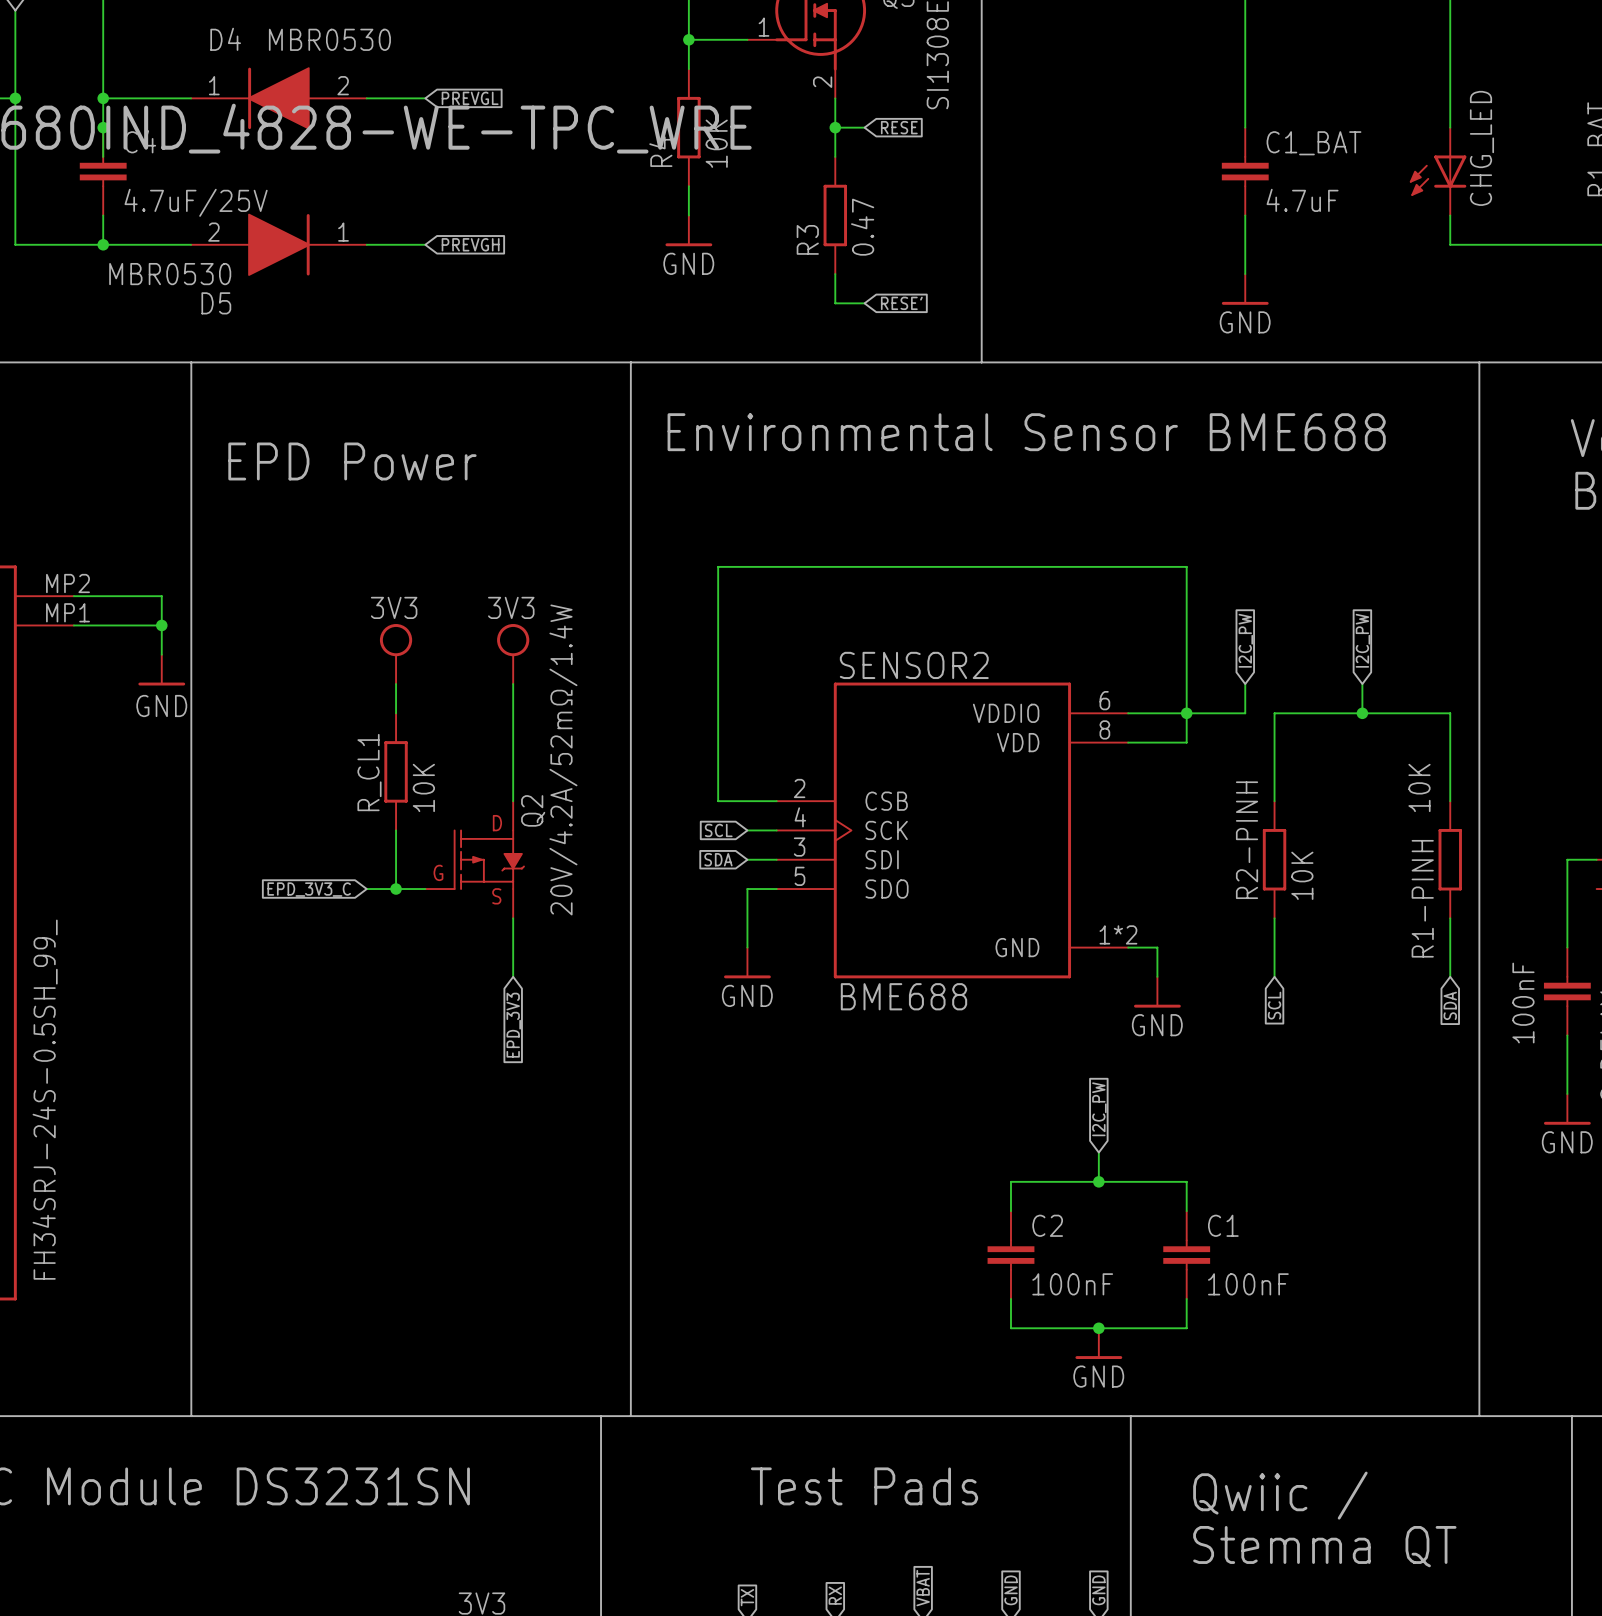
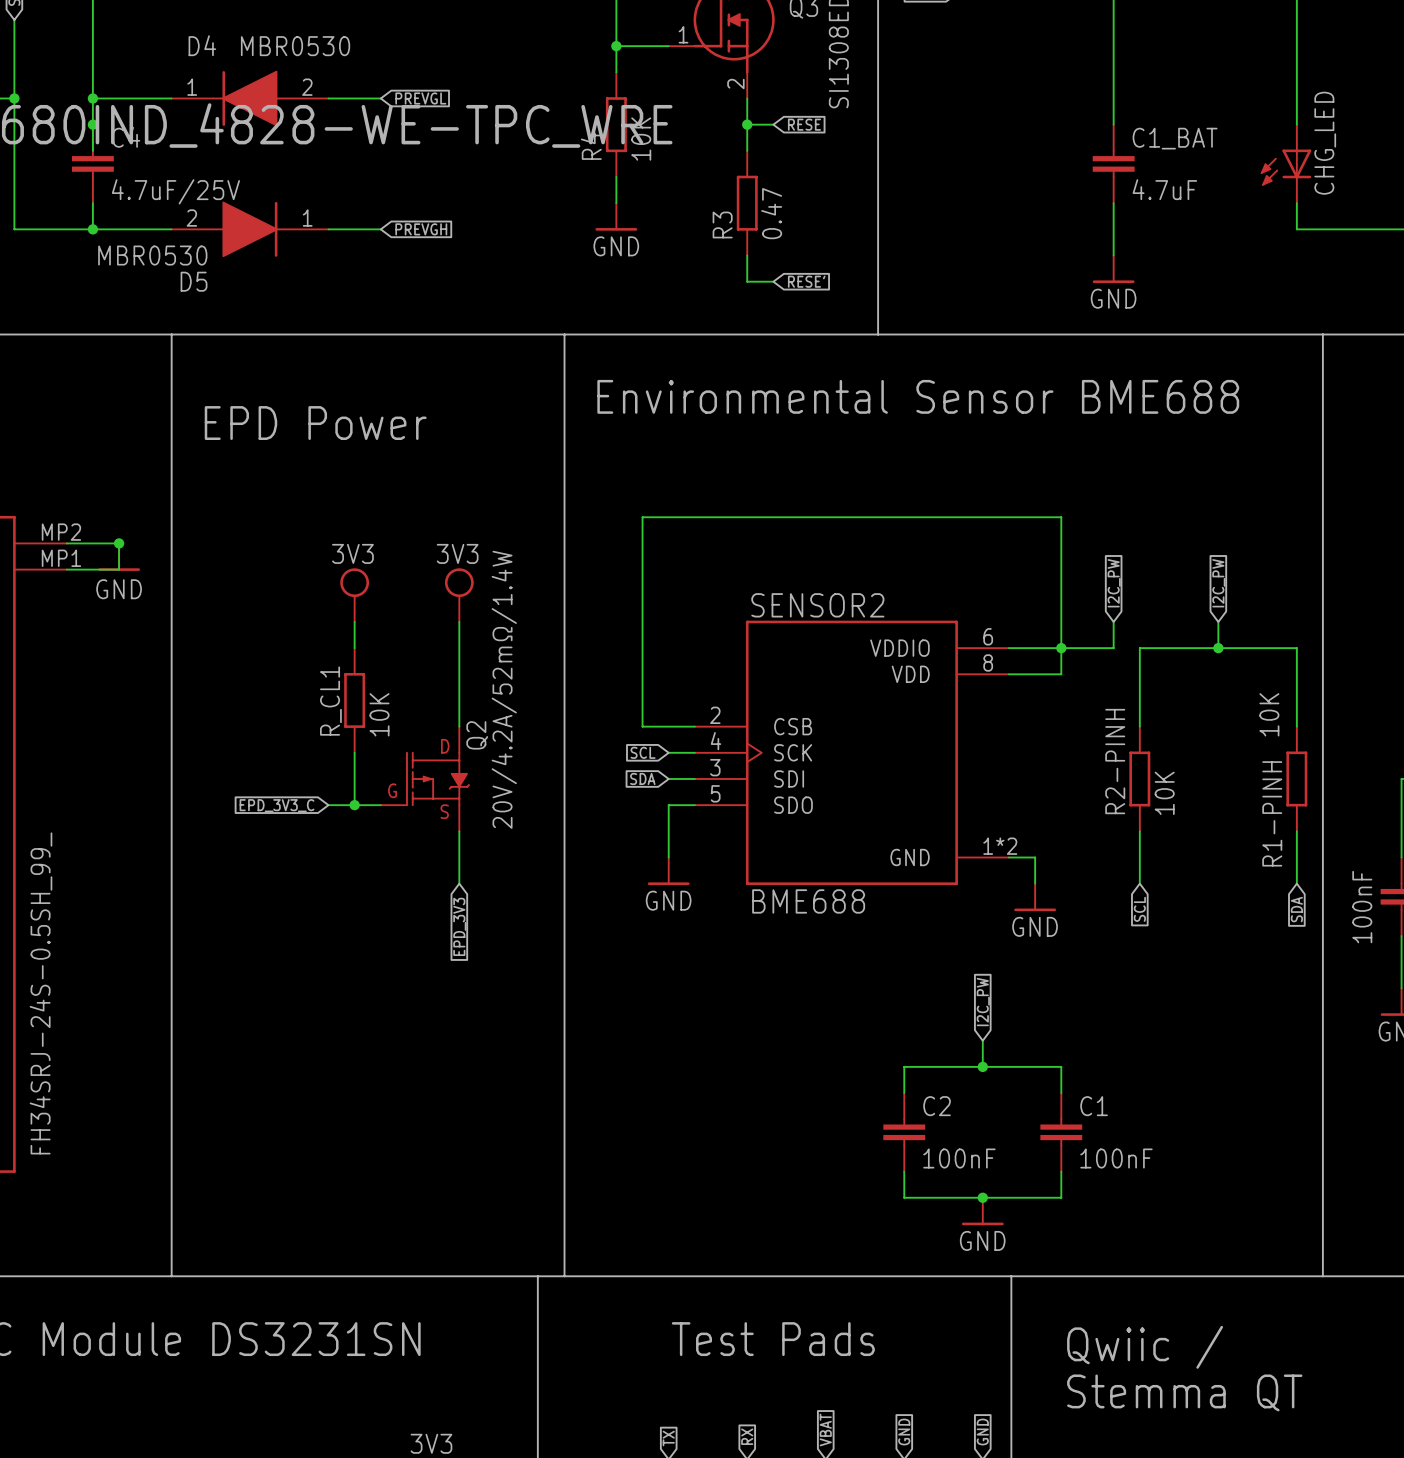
wire: (132, 596) (161, 596) (161, 654) -> (119, 543) (119, 569)
junction position: (161, 625) -> (119, 543)
power symbol position: GND (161, 670) -> GND (119, 557)

